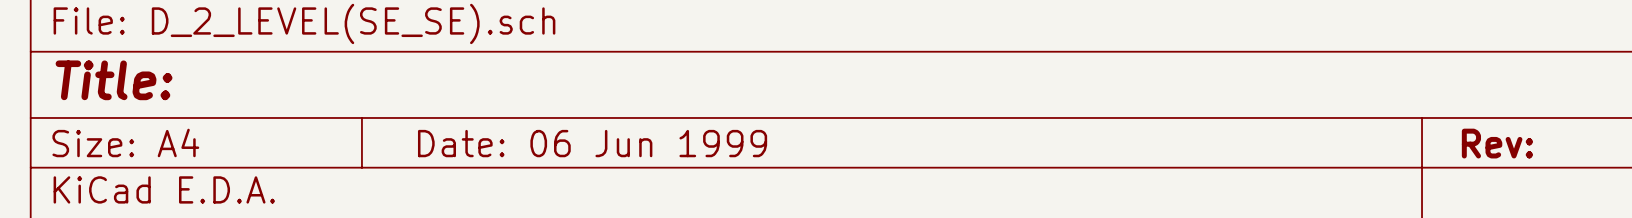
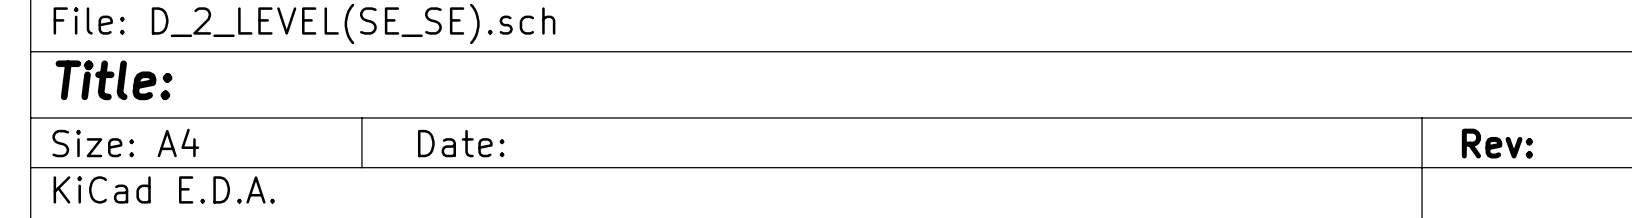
title block: Date: 06 Jun 1999 (592, 143) -> Date: (461, 143)

